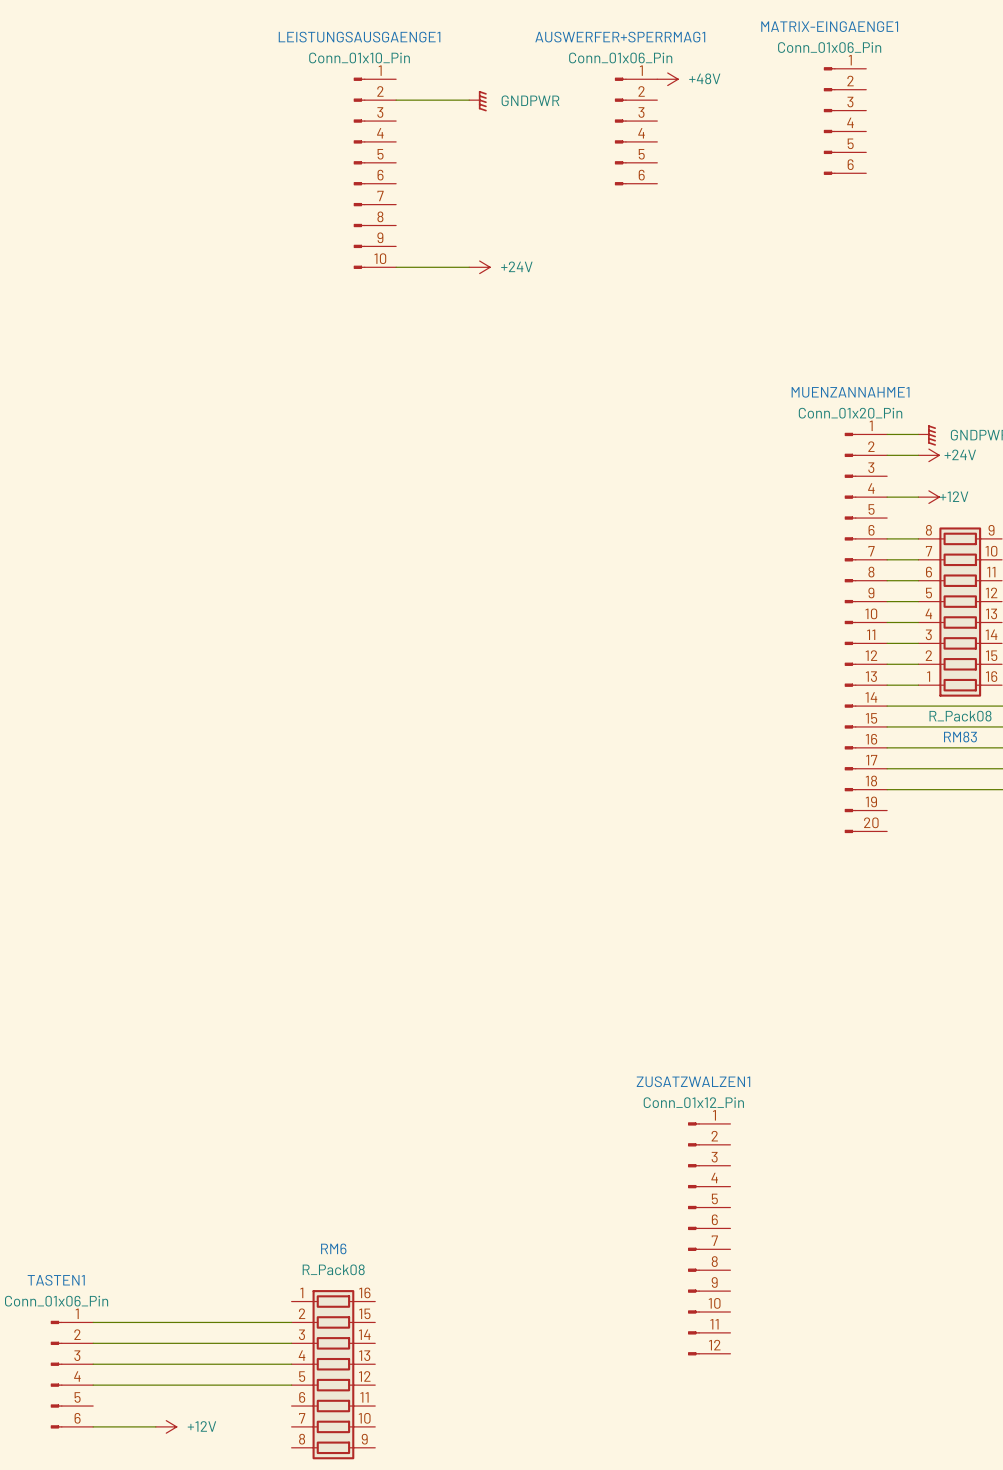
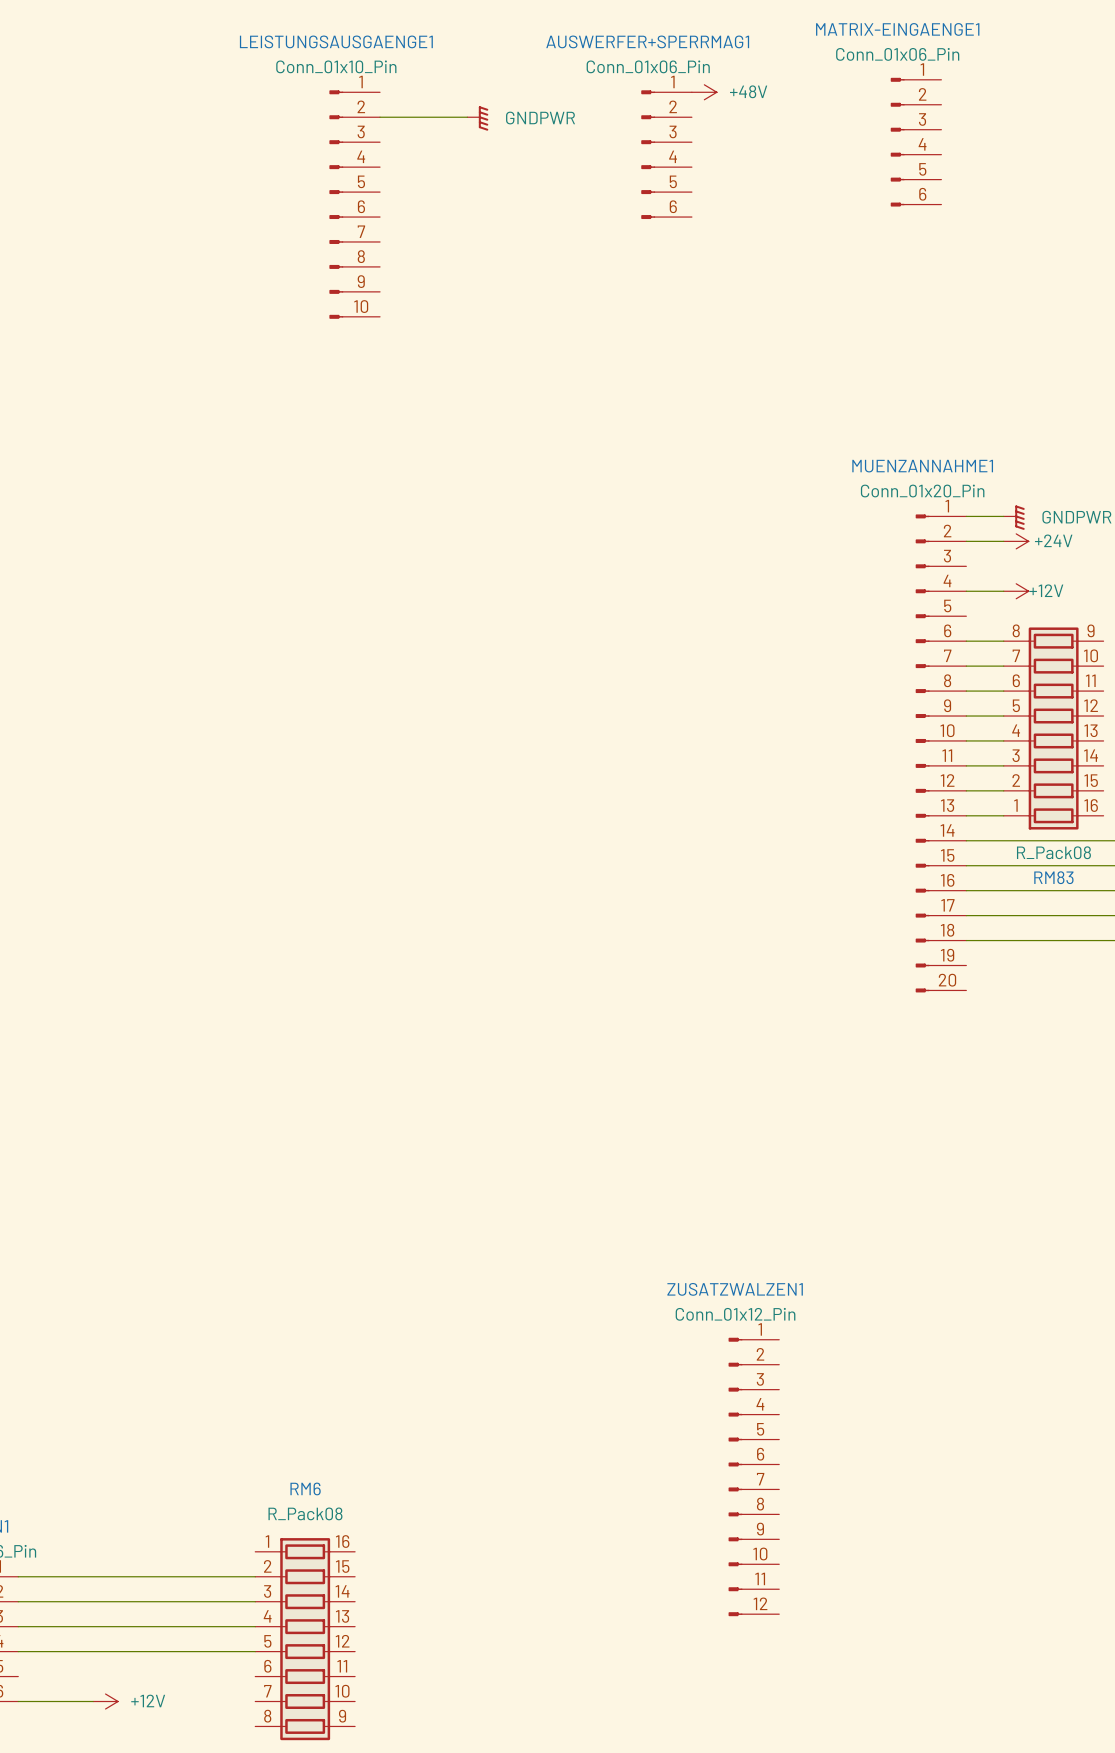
wire: (396, 267) (469, 267) -> none
power symbol: +24V (479, 267) -> none

